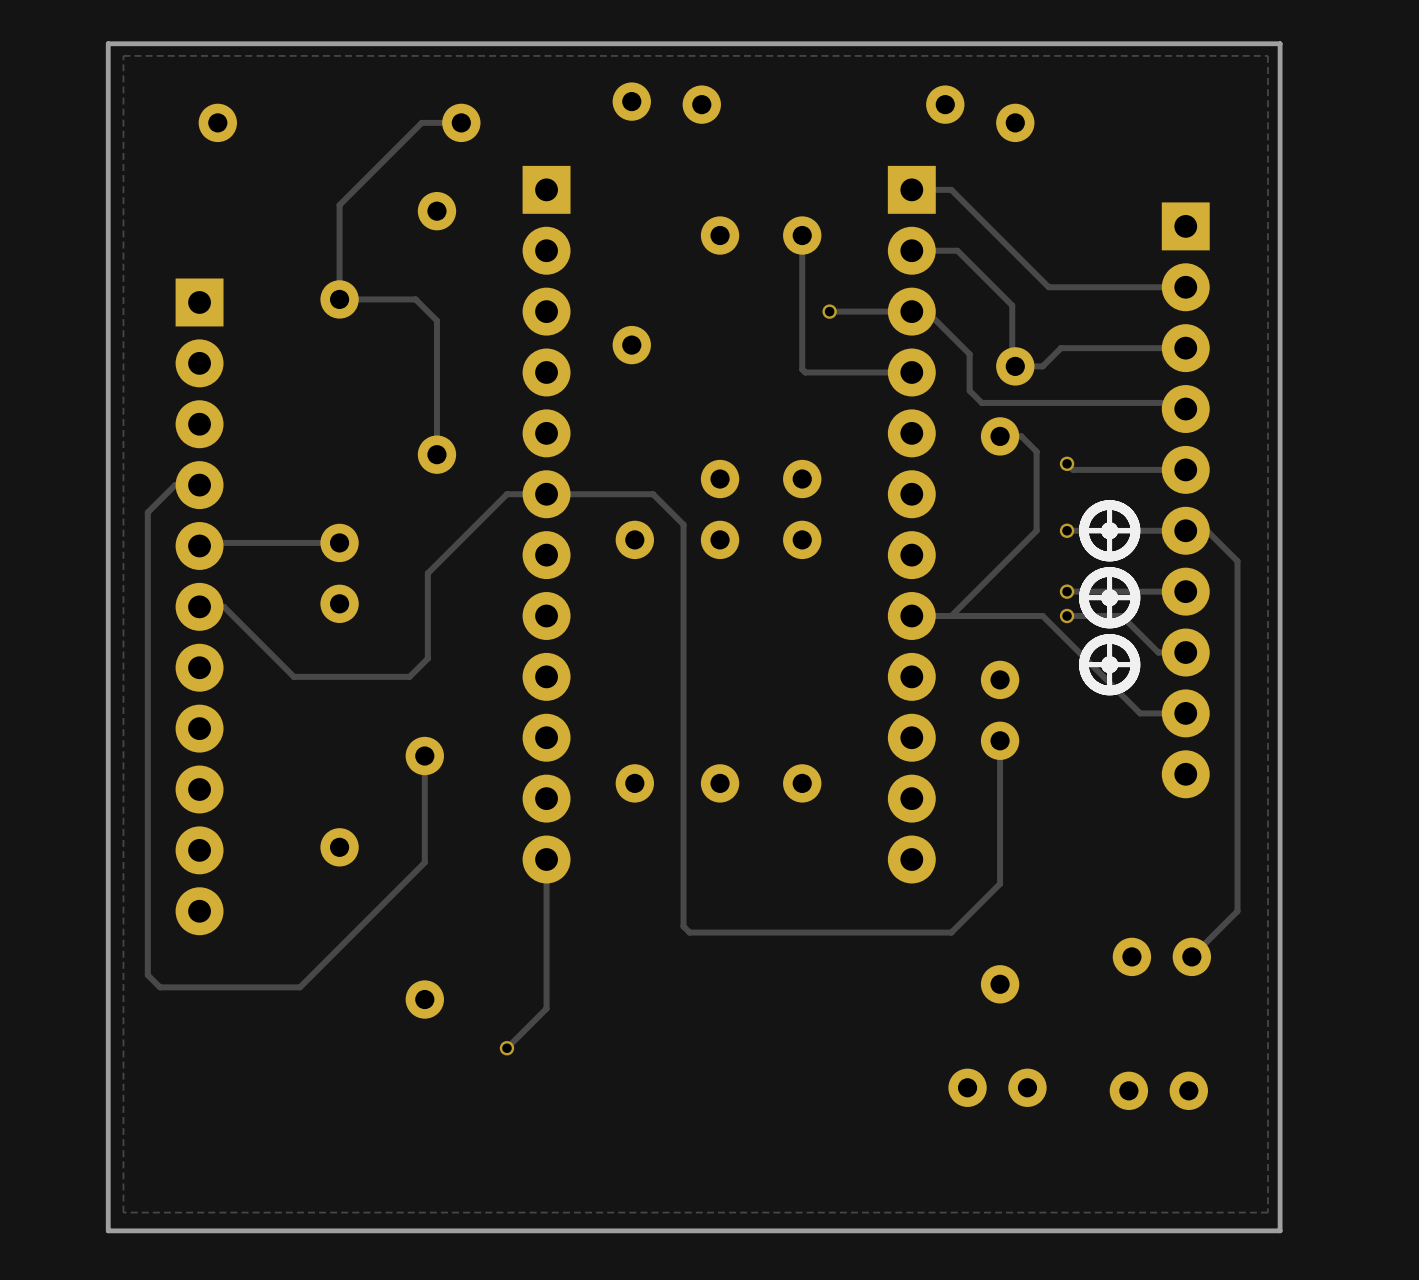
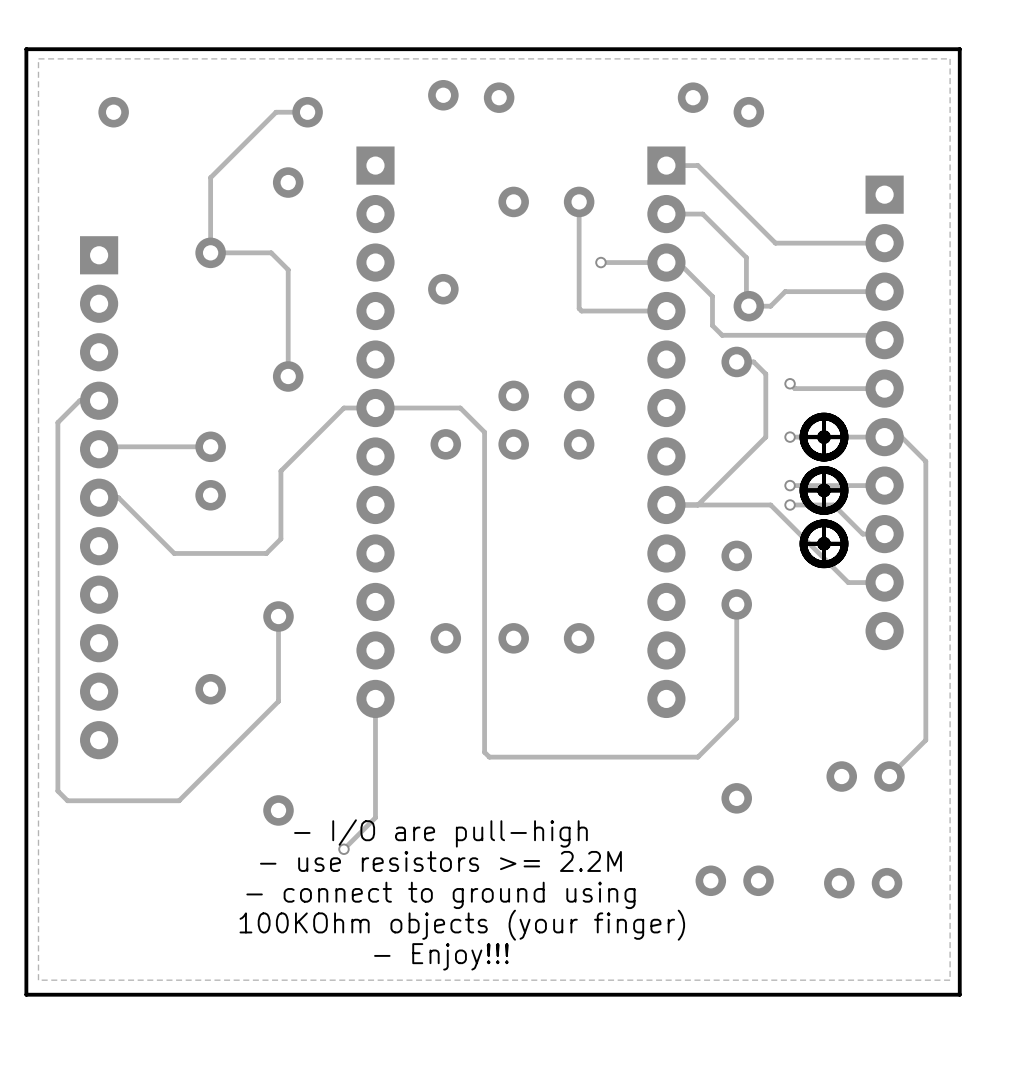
text: none -> - I/O are pull-high (440, 833)
text: none -> - use resistors >= 2.2M (440, 861)
text: none -> - connect to ground using (440, 895)
text: none -> 100KOhm objects (your finger) (462, 925)
text: none -> - Enjoy!!! (441, 956)

